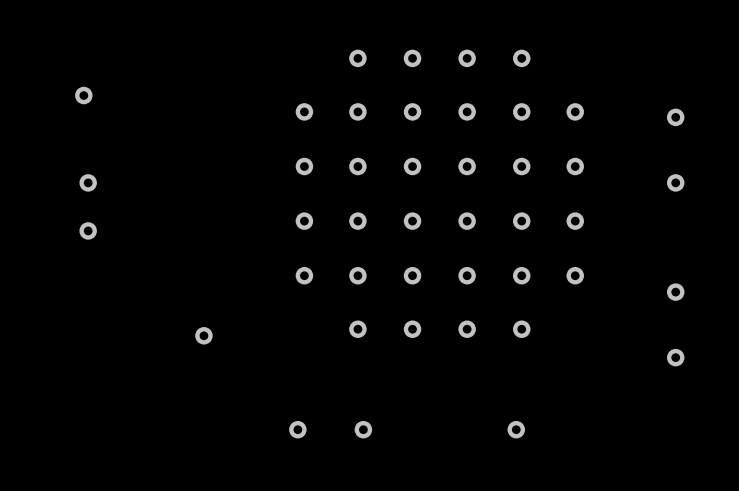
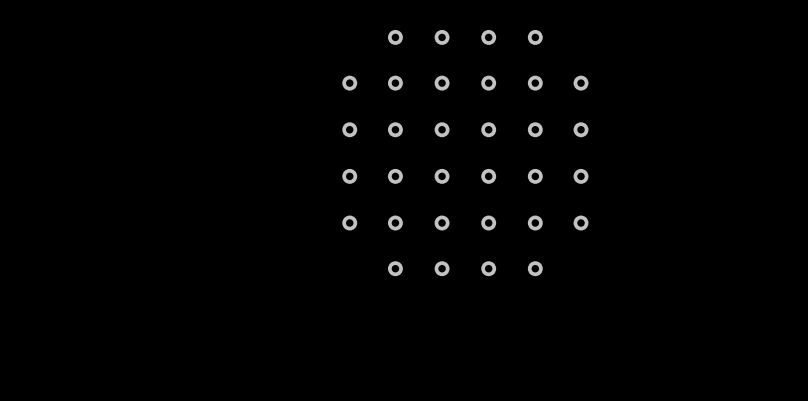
via: (83, 95) -> none
via: (675, 117) -> none
via: (88, 182) -> none
via: (675, 182) -> none
via: (88, 230) -> none
via: (675, 292) -> none
via: (203, 335) -> none
via: (675, 357) -> none
via: (297, 429) -> none
via: (363, 429) -> none
via: (516, 429) -> none

